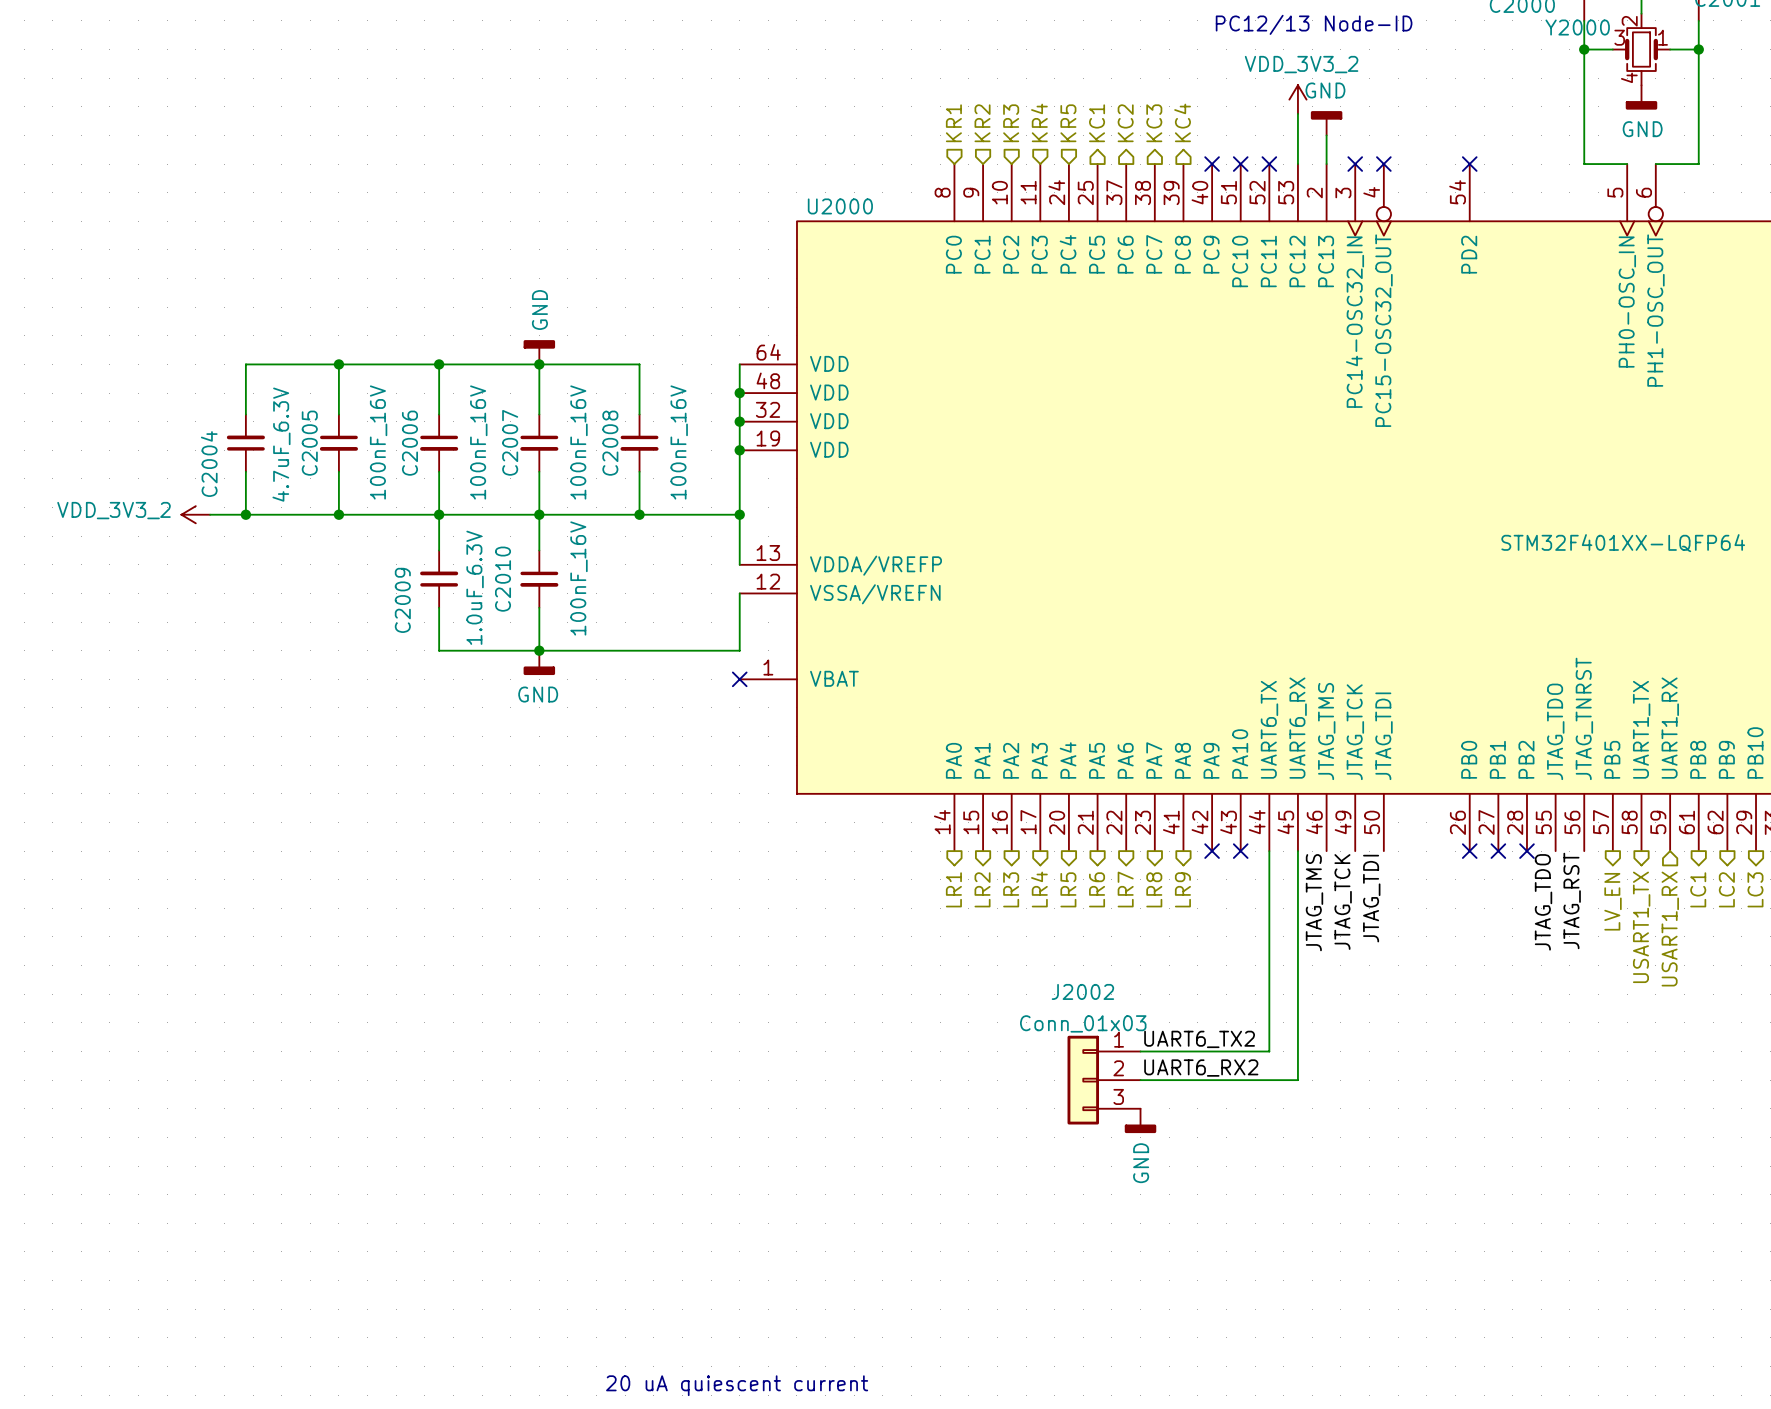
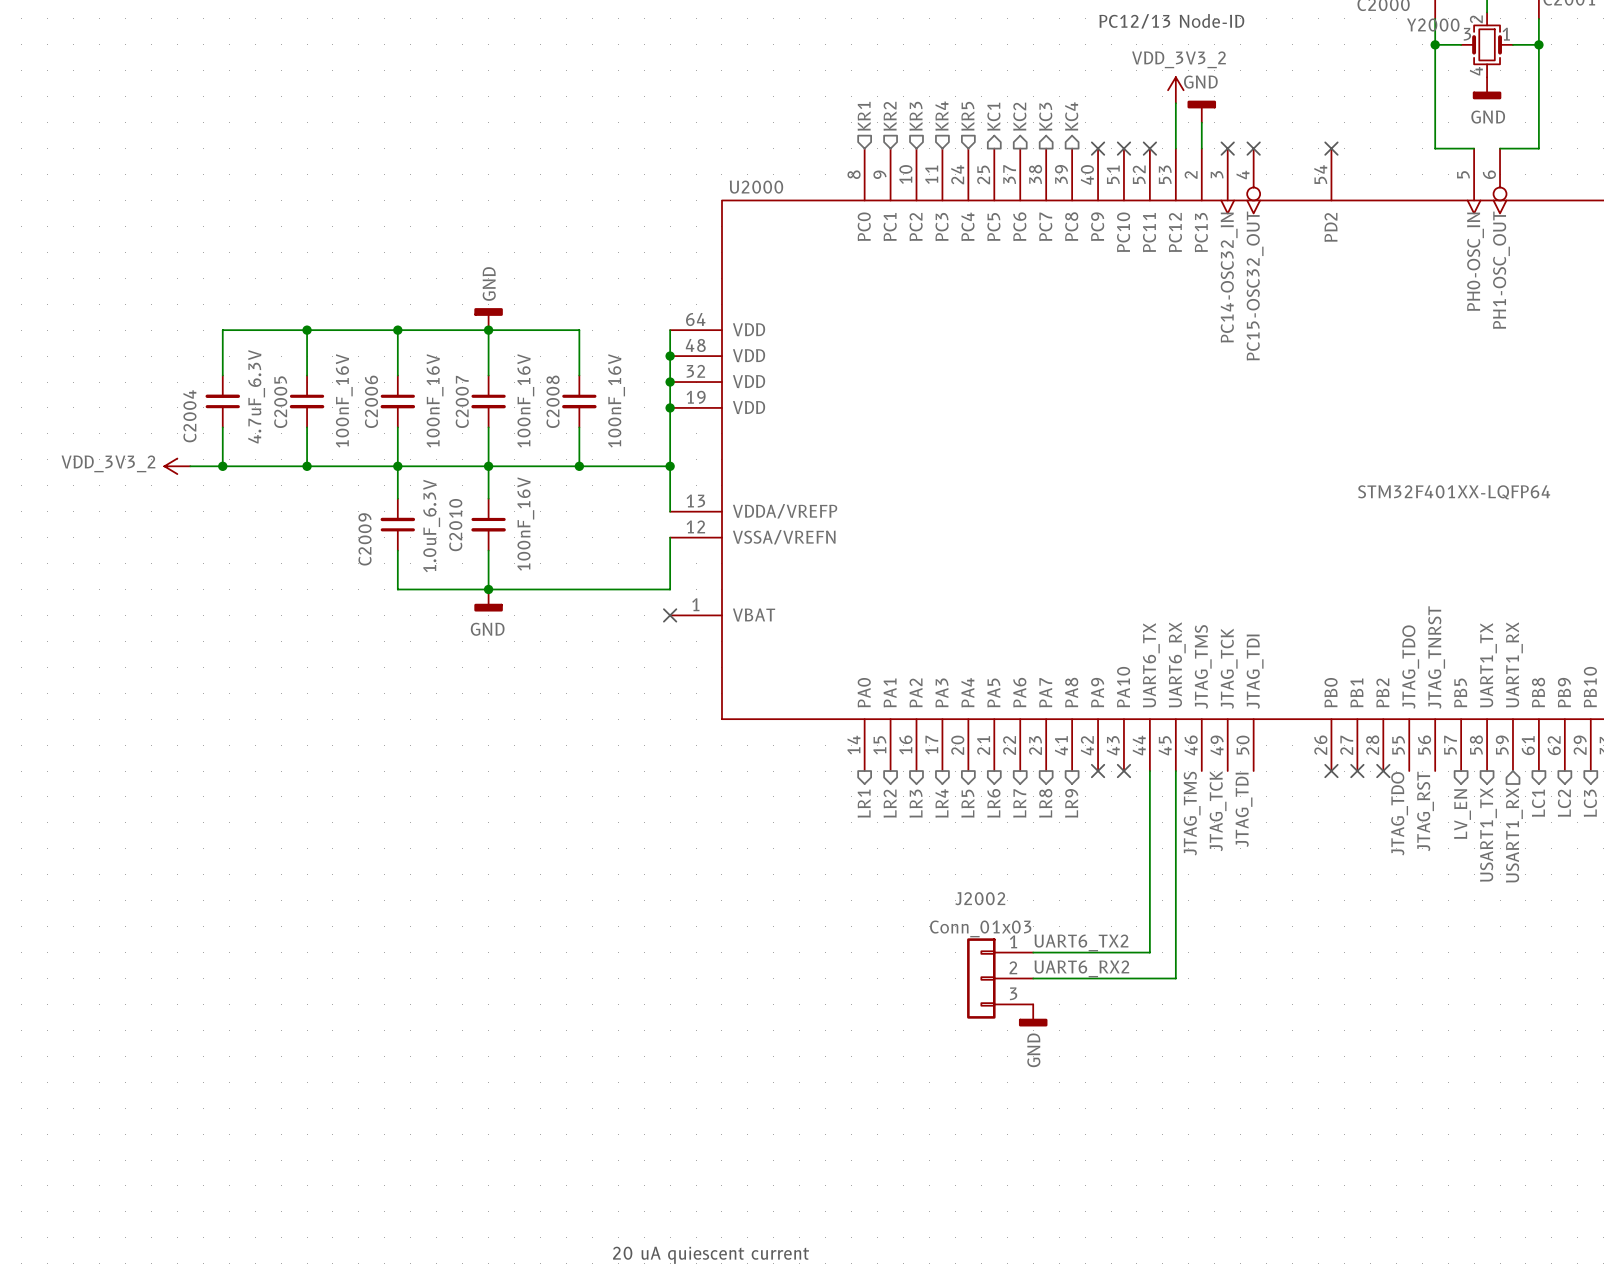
text position: 20 uA quiescent current (737, 1385) -> 20 uA quiescent current (711, 1255)

